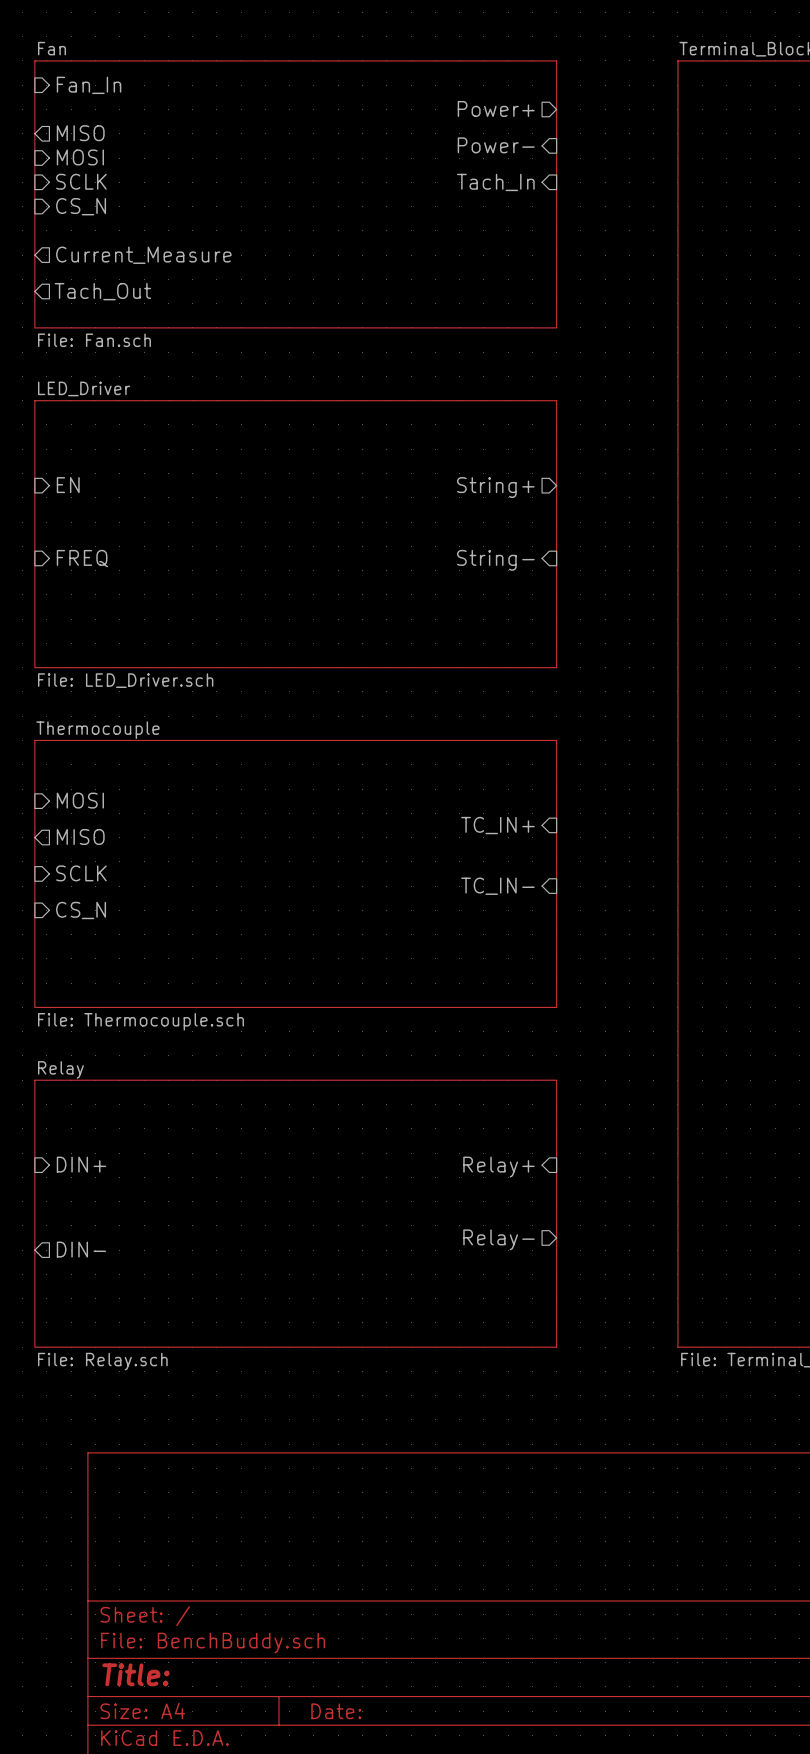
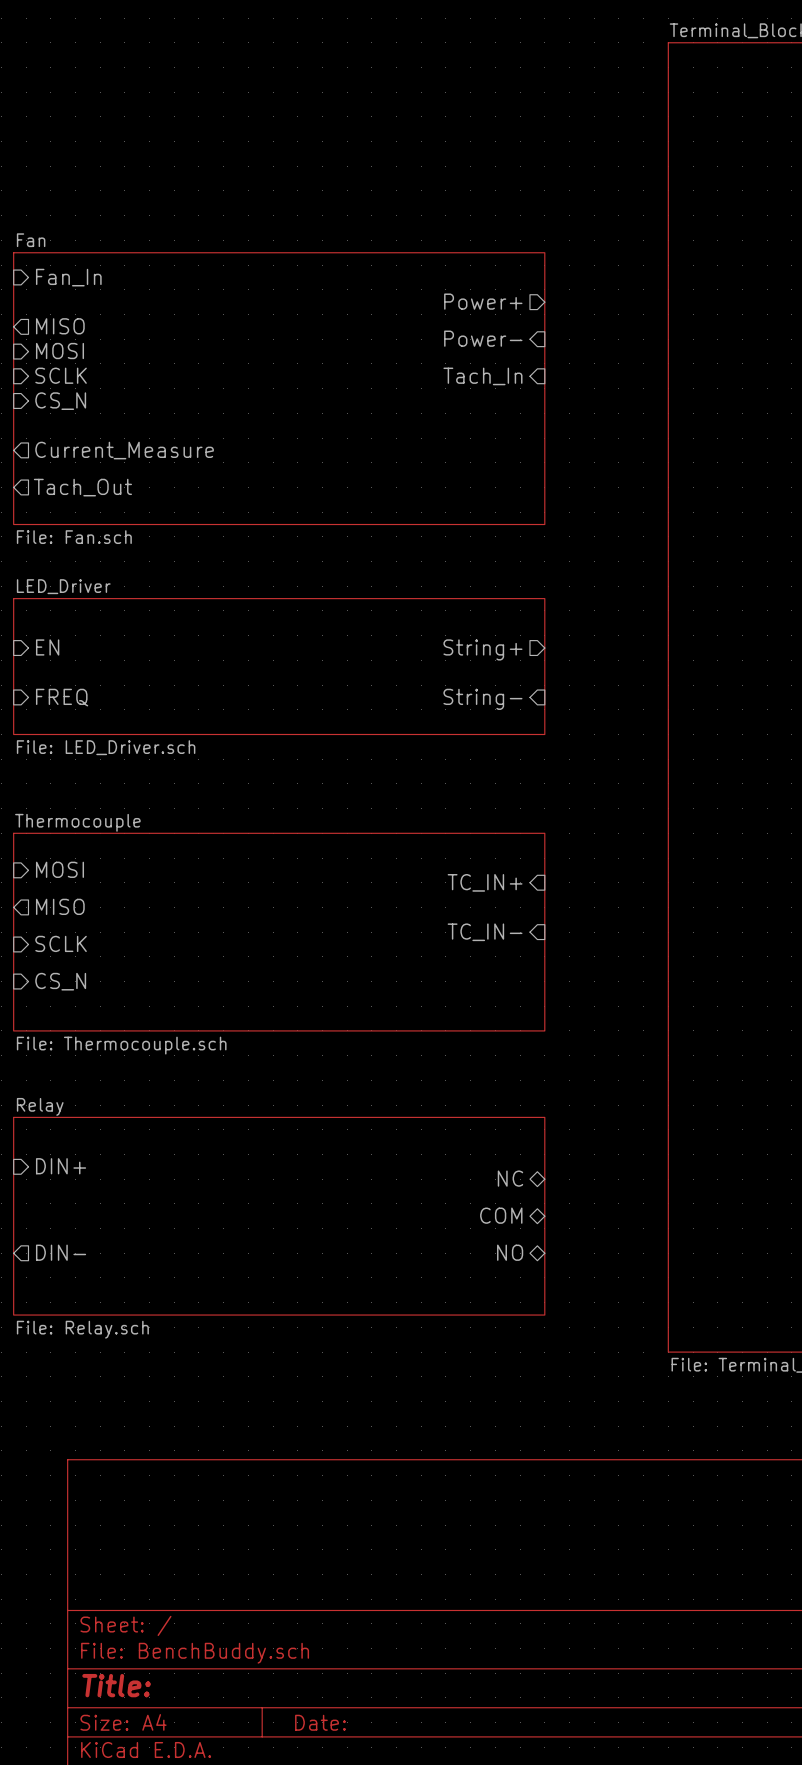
sheet pin: Fan_In (89, 85) -> none
sheet pin position: Power+ (496, 108) -> Power+ (483, 301)
sheet pin position: MISO (80, 133) -> MISO (60, 326)
sheet pin position: Power- (496, 145) -> Power- (483, 338)
sheet pin position: MOSI (80, 157) -> MOSI (59, 351)
sheet pin position: SCLK (81, 181) -> SCLK (61, 375)
sheet pin position: Tach_In (495, 182) -> Tach_In (482, 376)
sheet Fan position: (295, 194) -> (279, 388)
sheet pin position: CS_N (81, 206) -> CS_N (60, 401)
sheet pin position: Current_Measure (143, 255) -> Current_Measure (124, 450)
sheet pin shape: output (102, 291) -> input (68, 277)
sheet pin: Tach_Out (102, 291) -> Fan_In (68, 277)
sheet pin position: EN (68, 485) -> EN (47, 647)
sheet pin position: String+ (495, 487) -> String+ (482, 649)
sheet pin: none -> Tach_Out (82, 487)
sheet LED_Driver: File: LED_Driver.sch (295, 534) -> none
sheet pin position: FREQ (82, 558) -> FREQ (62, 697)
sheet pin position: String- (495, 560) -> String- (482, 699)
sheet LED_Driver: none -> File: LED_Driver.sch (279, 666)
sheet pin: MOSI (80, 800) -> none
sheet pin: TC_IN+ (497, 825) -> none
sheet pin: MISO (80, 836) -> none
sheet pin: SCLK (81, 873) -> MOSI (59, 869)
sheet Thermocouple: File: Thermocouple.sch (295, 873) -> none
sheet pin: TC_IN- (497, 886) -> TC_IN+ (485, 882)
sheet pin shape: input (81, 910) -> output (60, 906)
sheet pin: CS_N (81, 910) -> MISO (60, 906)
sheet Thermocouple: none -> File: Thermocouple.sch (279, 932)
sheet pin: none -> TC_IN- (485, 932)
sheet pin: none -> SCLK (61, 943)
sheet pin: none -> CS_N (60, 981)
sheet Relay name position: Relay (60, 1069) -> Relay (40, 1106)
sheet Relay shape: [34, 1080, 557, 1348] -> [13, 1117, 545, 1316]
sheet pin: Relay+ (498, 1167) -> none
sheet pin: none -> NC (510, 1178)
sheet pin: none -> COM (501, 1215)
sheet pin: Relay- (498, 1239) -> none
sheet pin: none -> NO (510, 1252)
sheet Relay value position: File: Relay.sch (102, 1361) -> File: Relay.sch (82, 1329)

